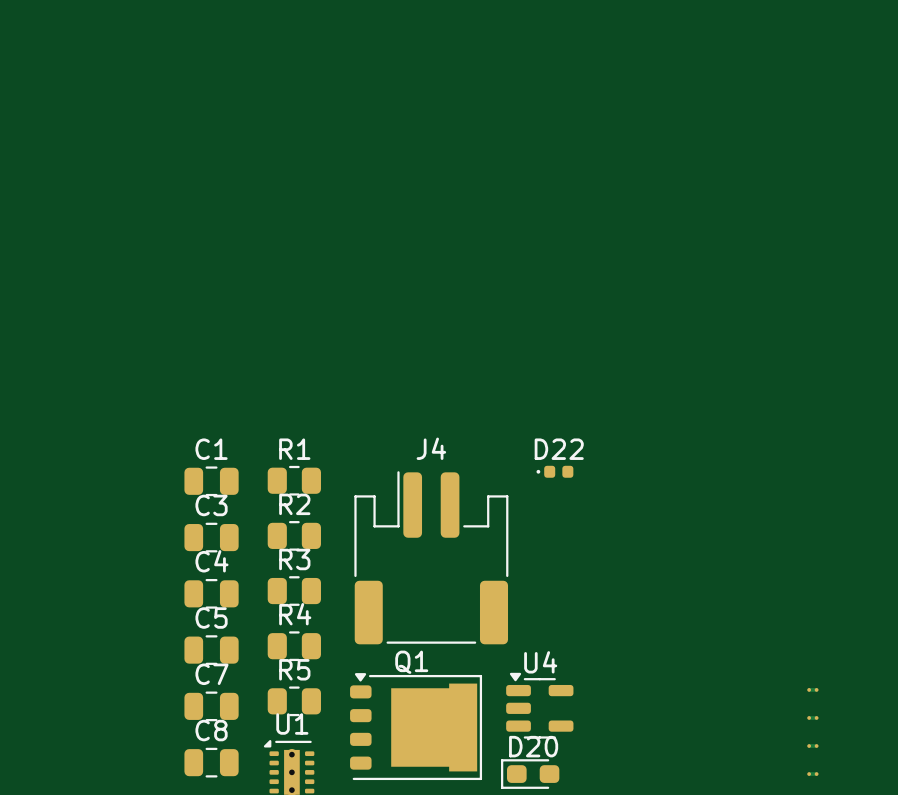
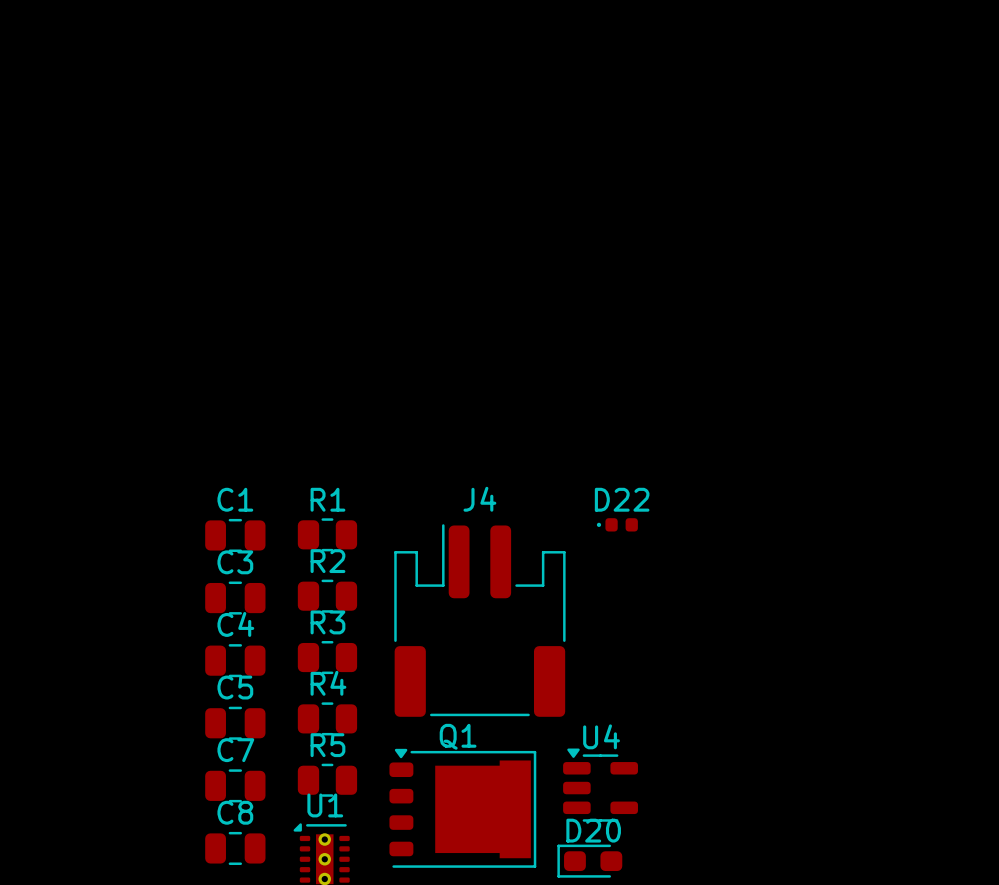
part: (812, 689) -> none
part: (812, 717) -> none
part: (812, 746) -> none
part: (812, 774) -> none

